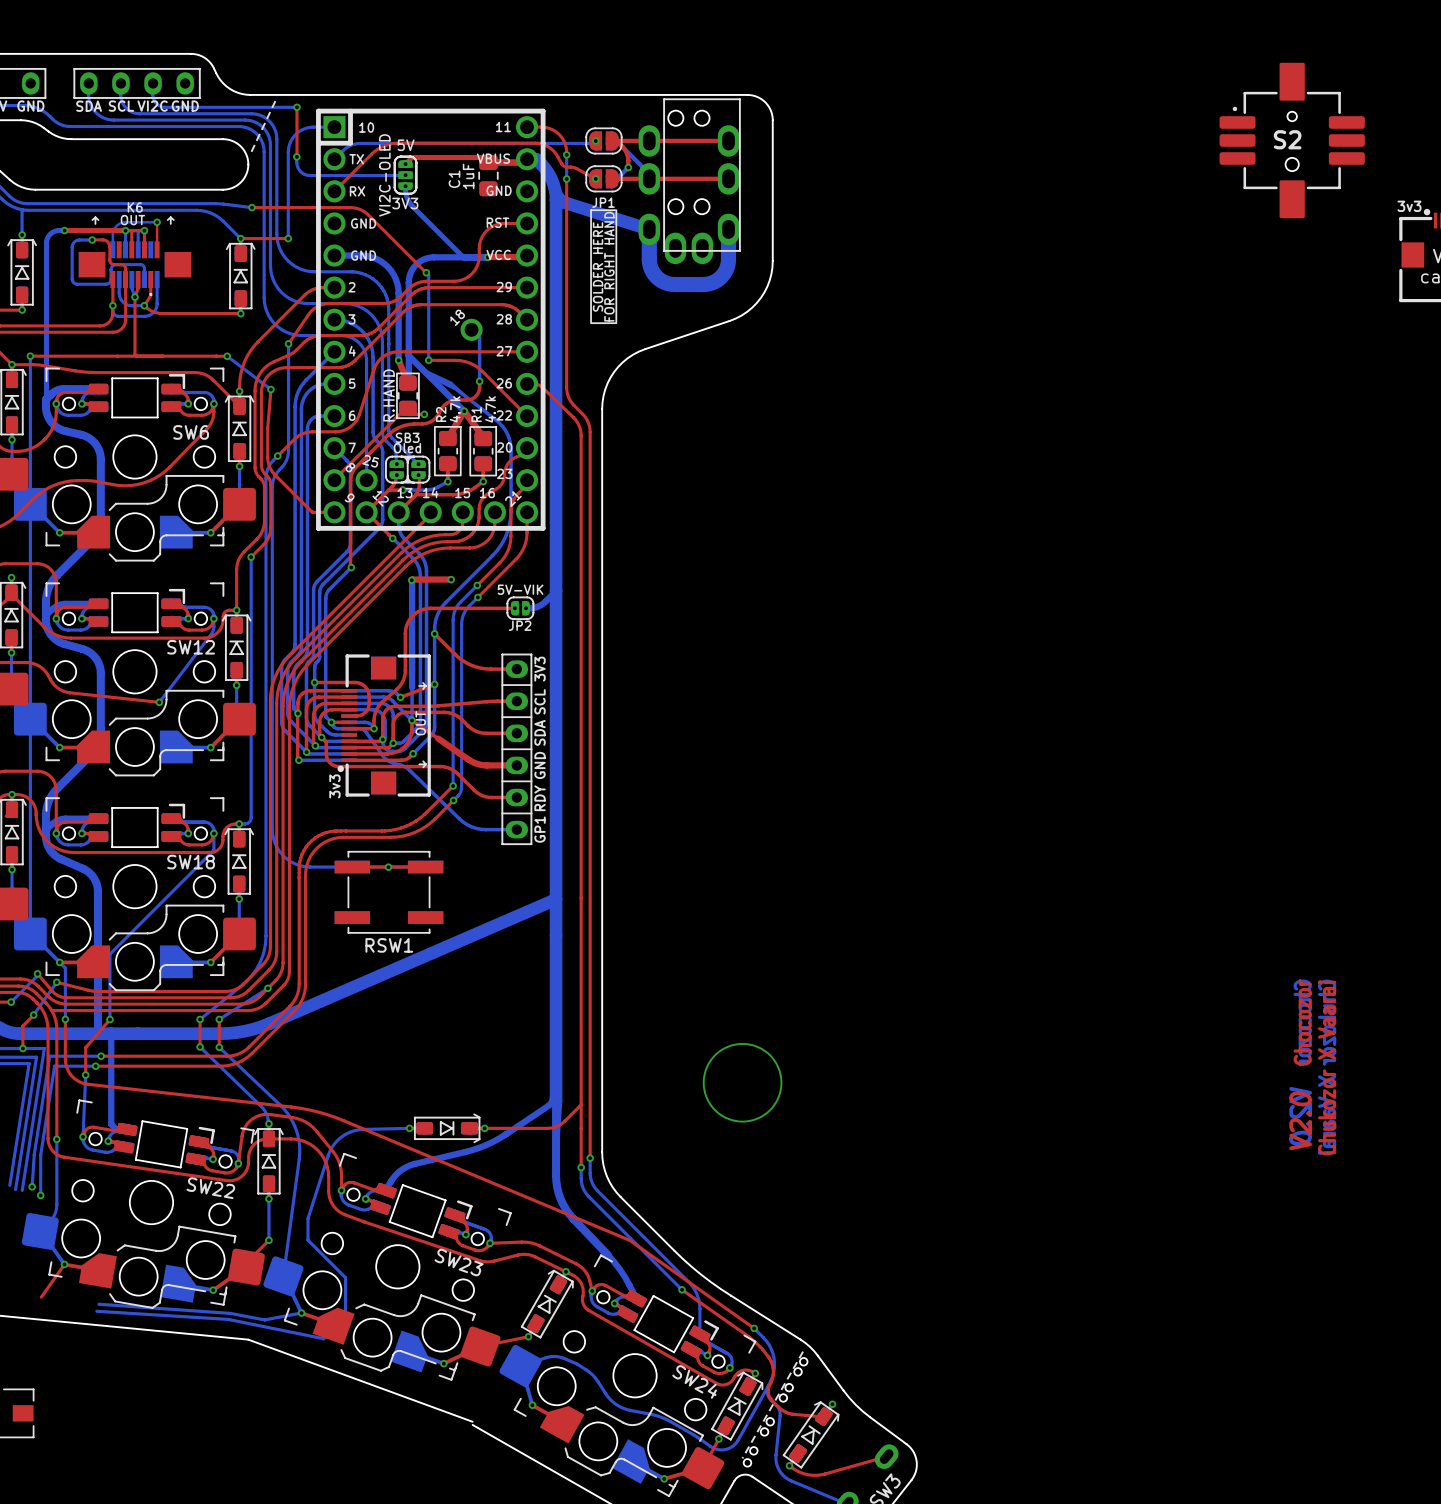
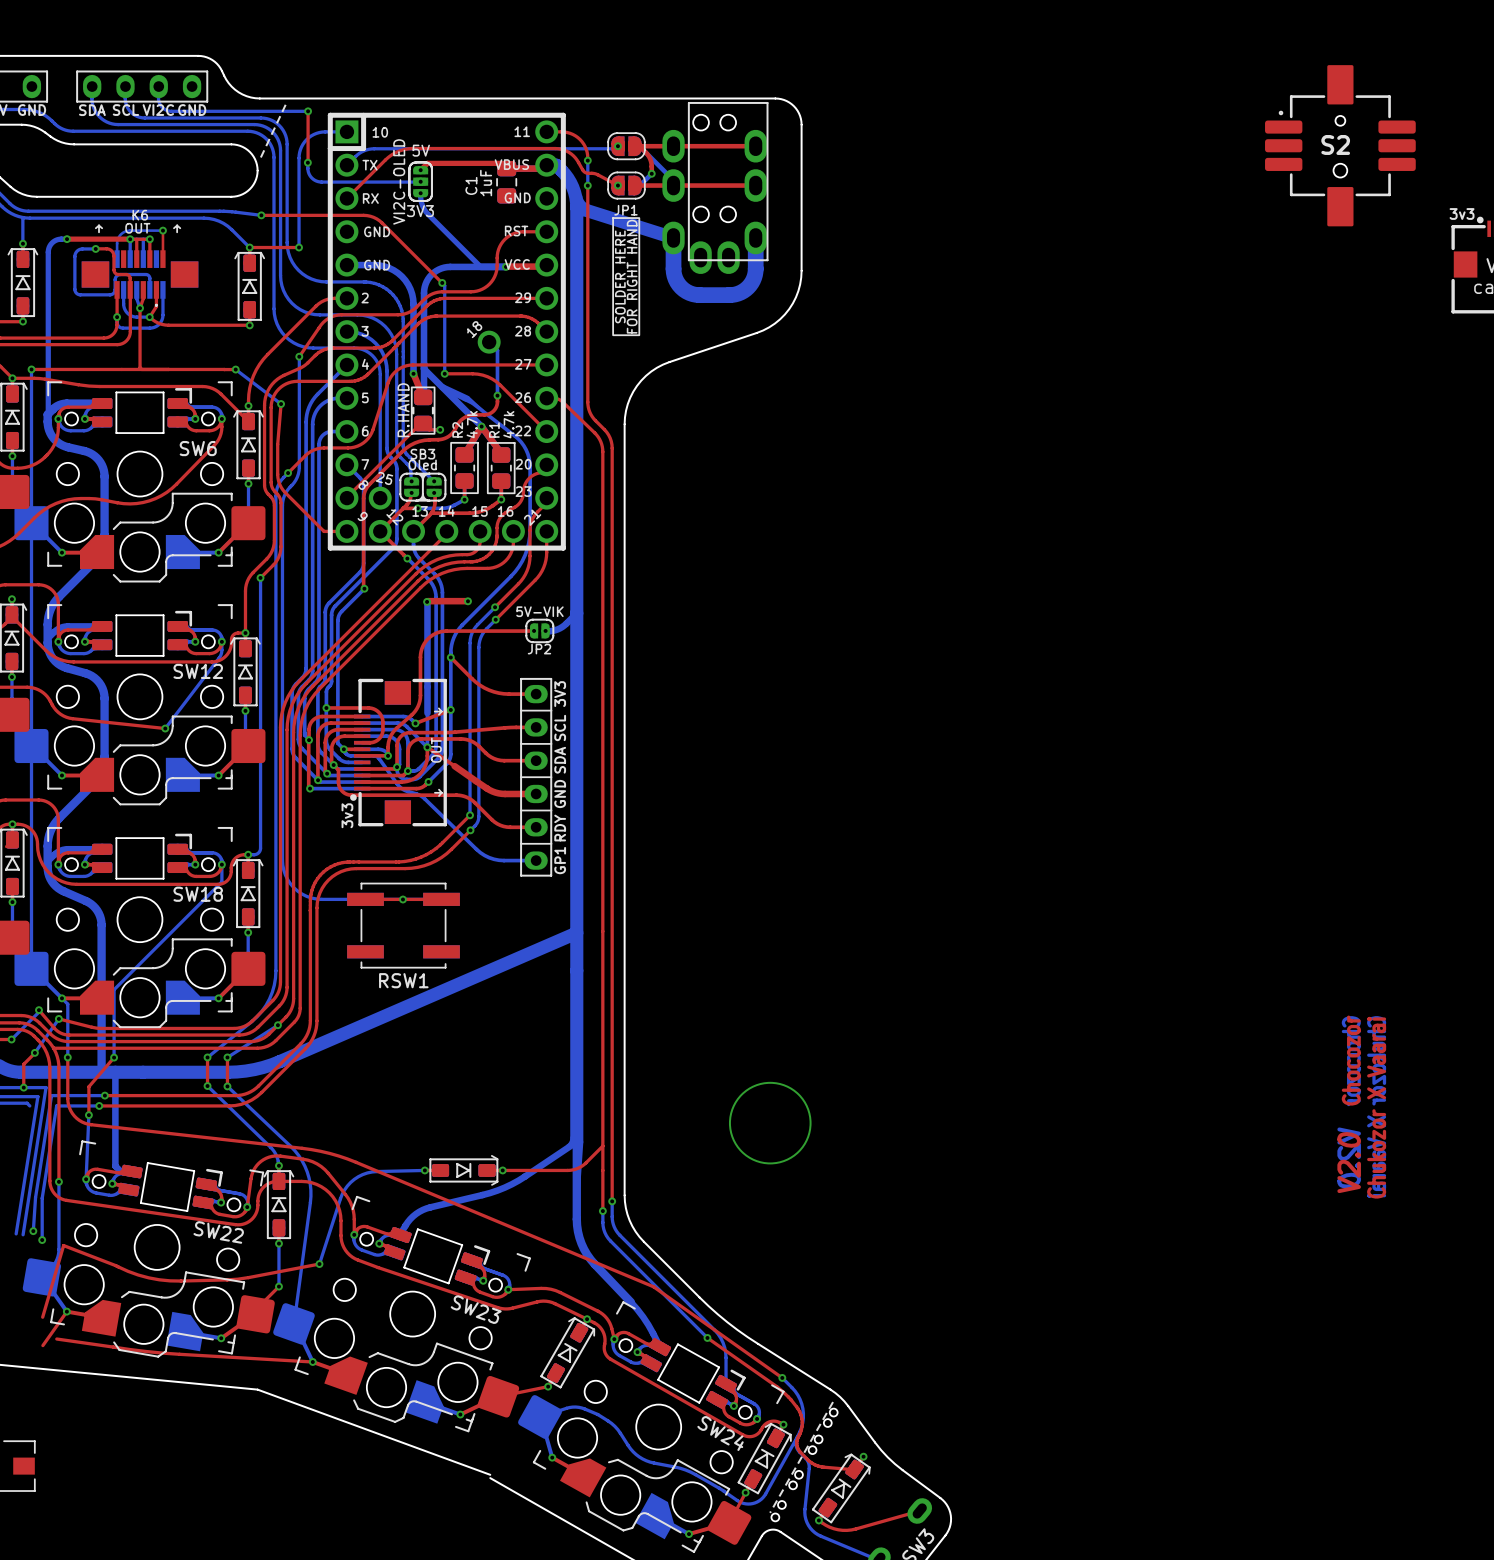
bottom track: (26, 1063) (29, 1063) (9, 1185) -> (27, 1103) (29, 1105)
bottom track: (307, 1218) (307, 1240) (345, 1277) (345, 1317) (323, 1338) (228, 1319) (96, 1311) -> none
top track: none -> (319, 1264) (237, 1279) (170, 1280) (138, 1275) (63, 1245) (42, 1317)
via: none -> (319, 1264)
top track: none -> (56, 1339) (162, 1353) (312, 1361)
bottom track: (98, 1304) (230, 1313) (264, 1319) (301, 1313) -> none

